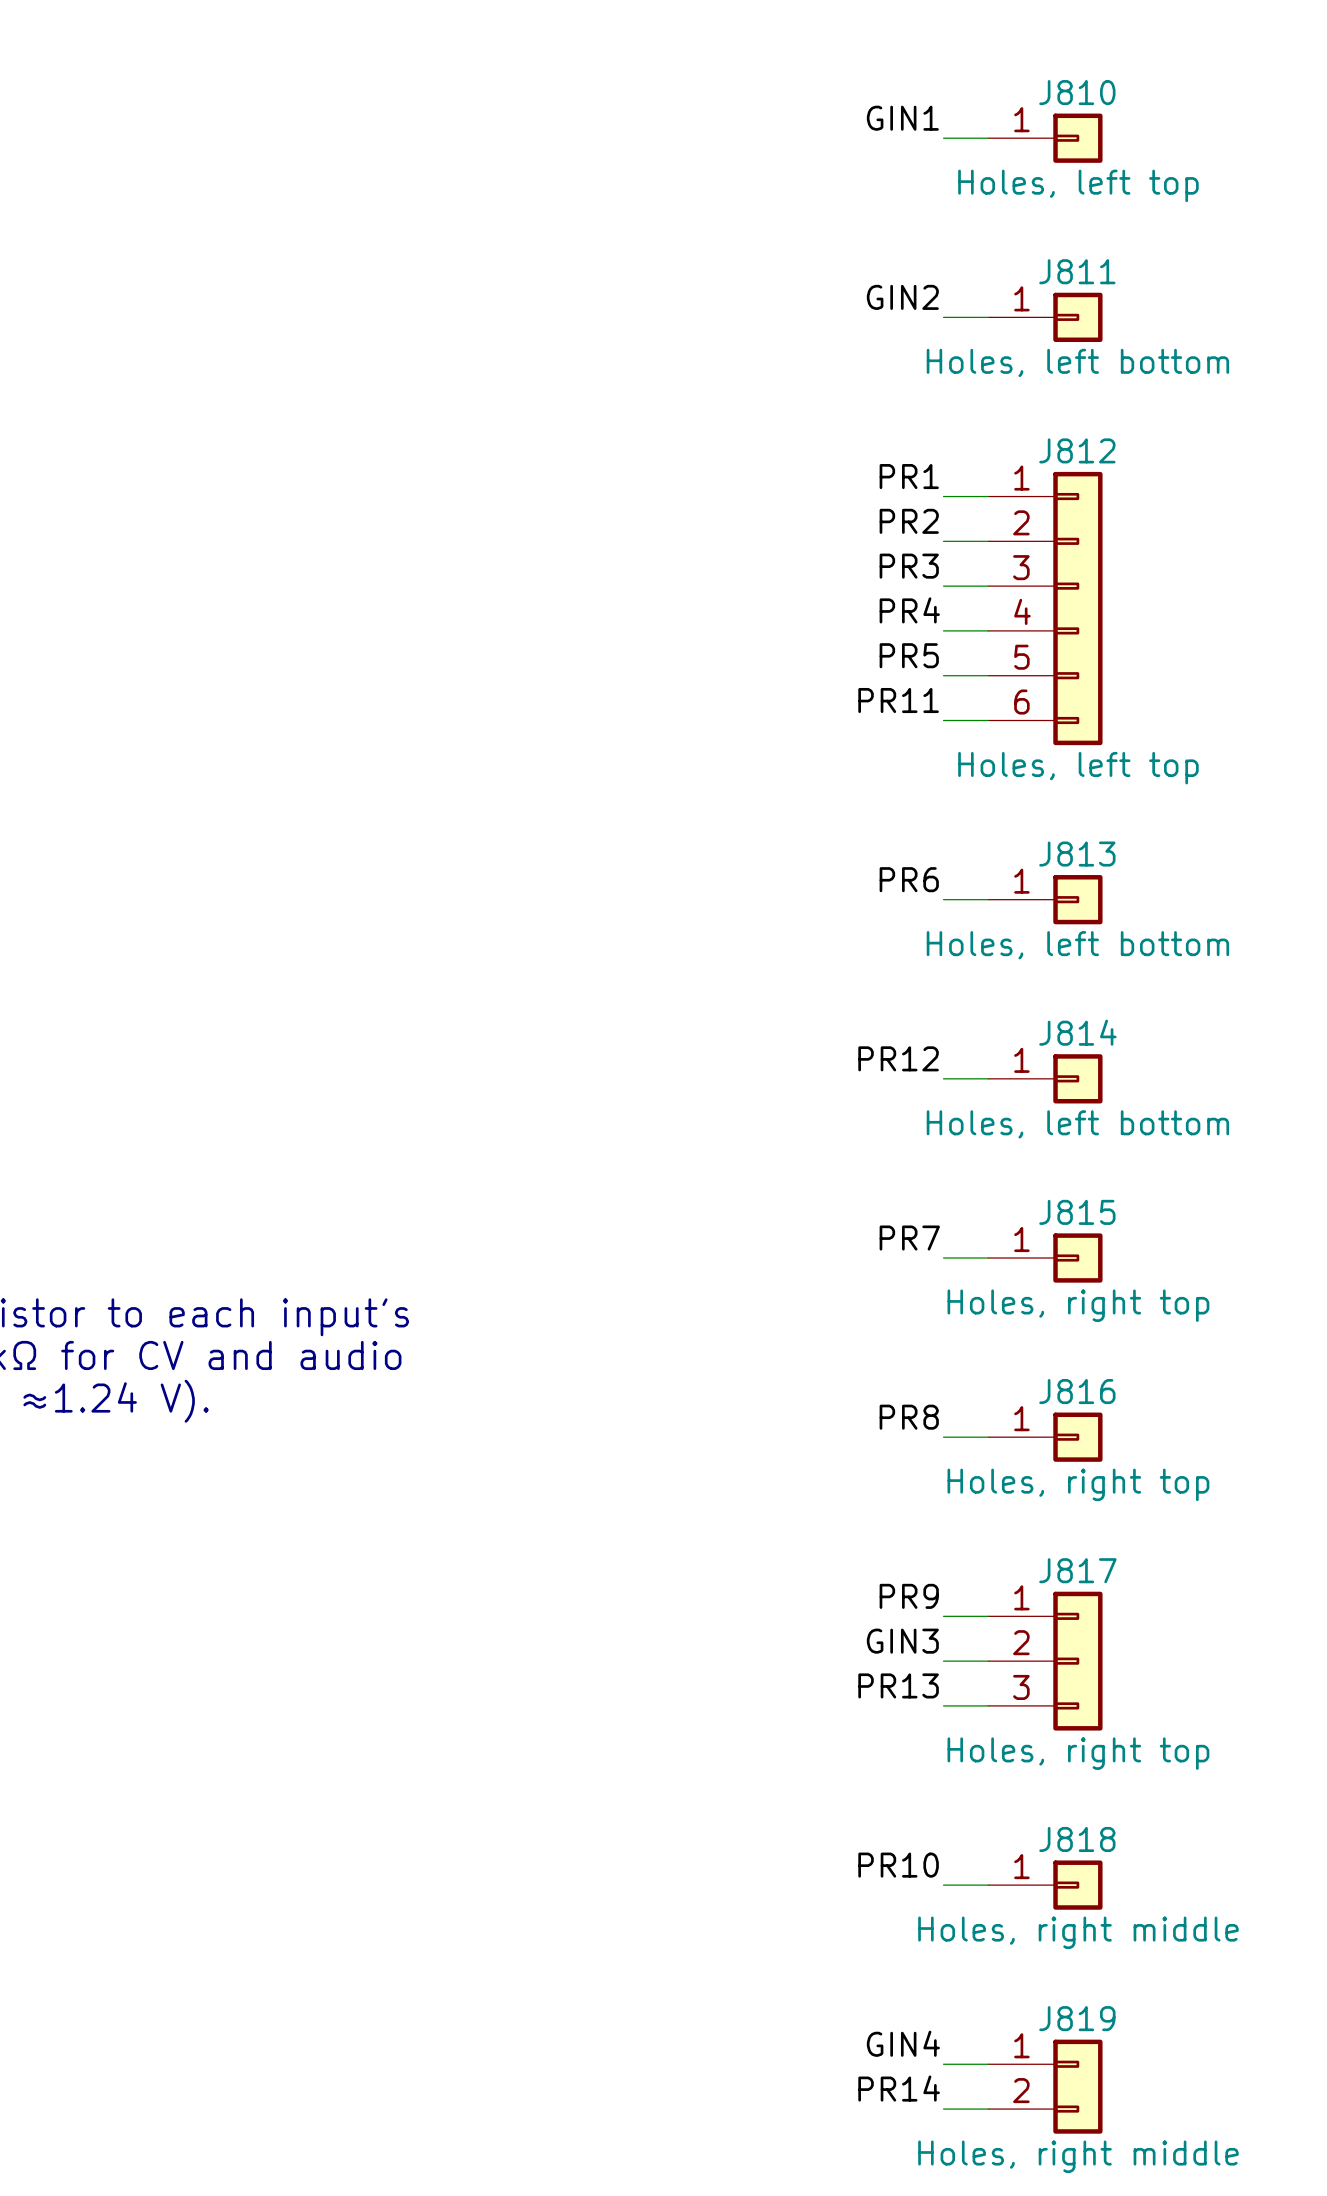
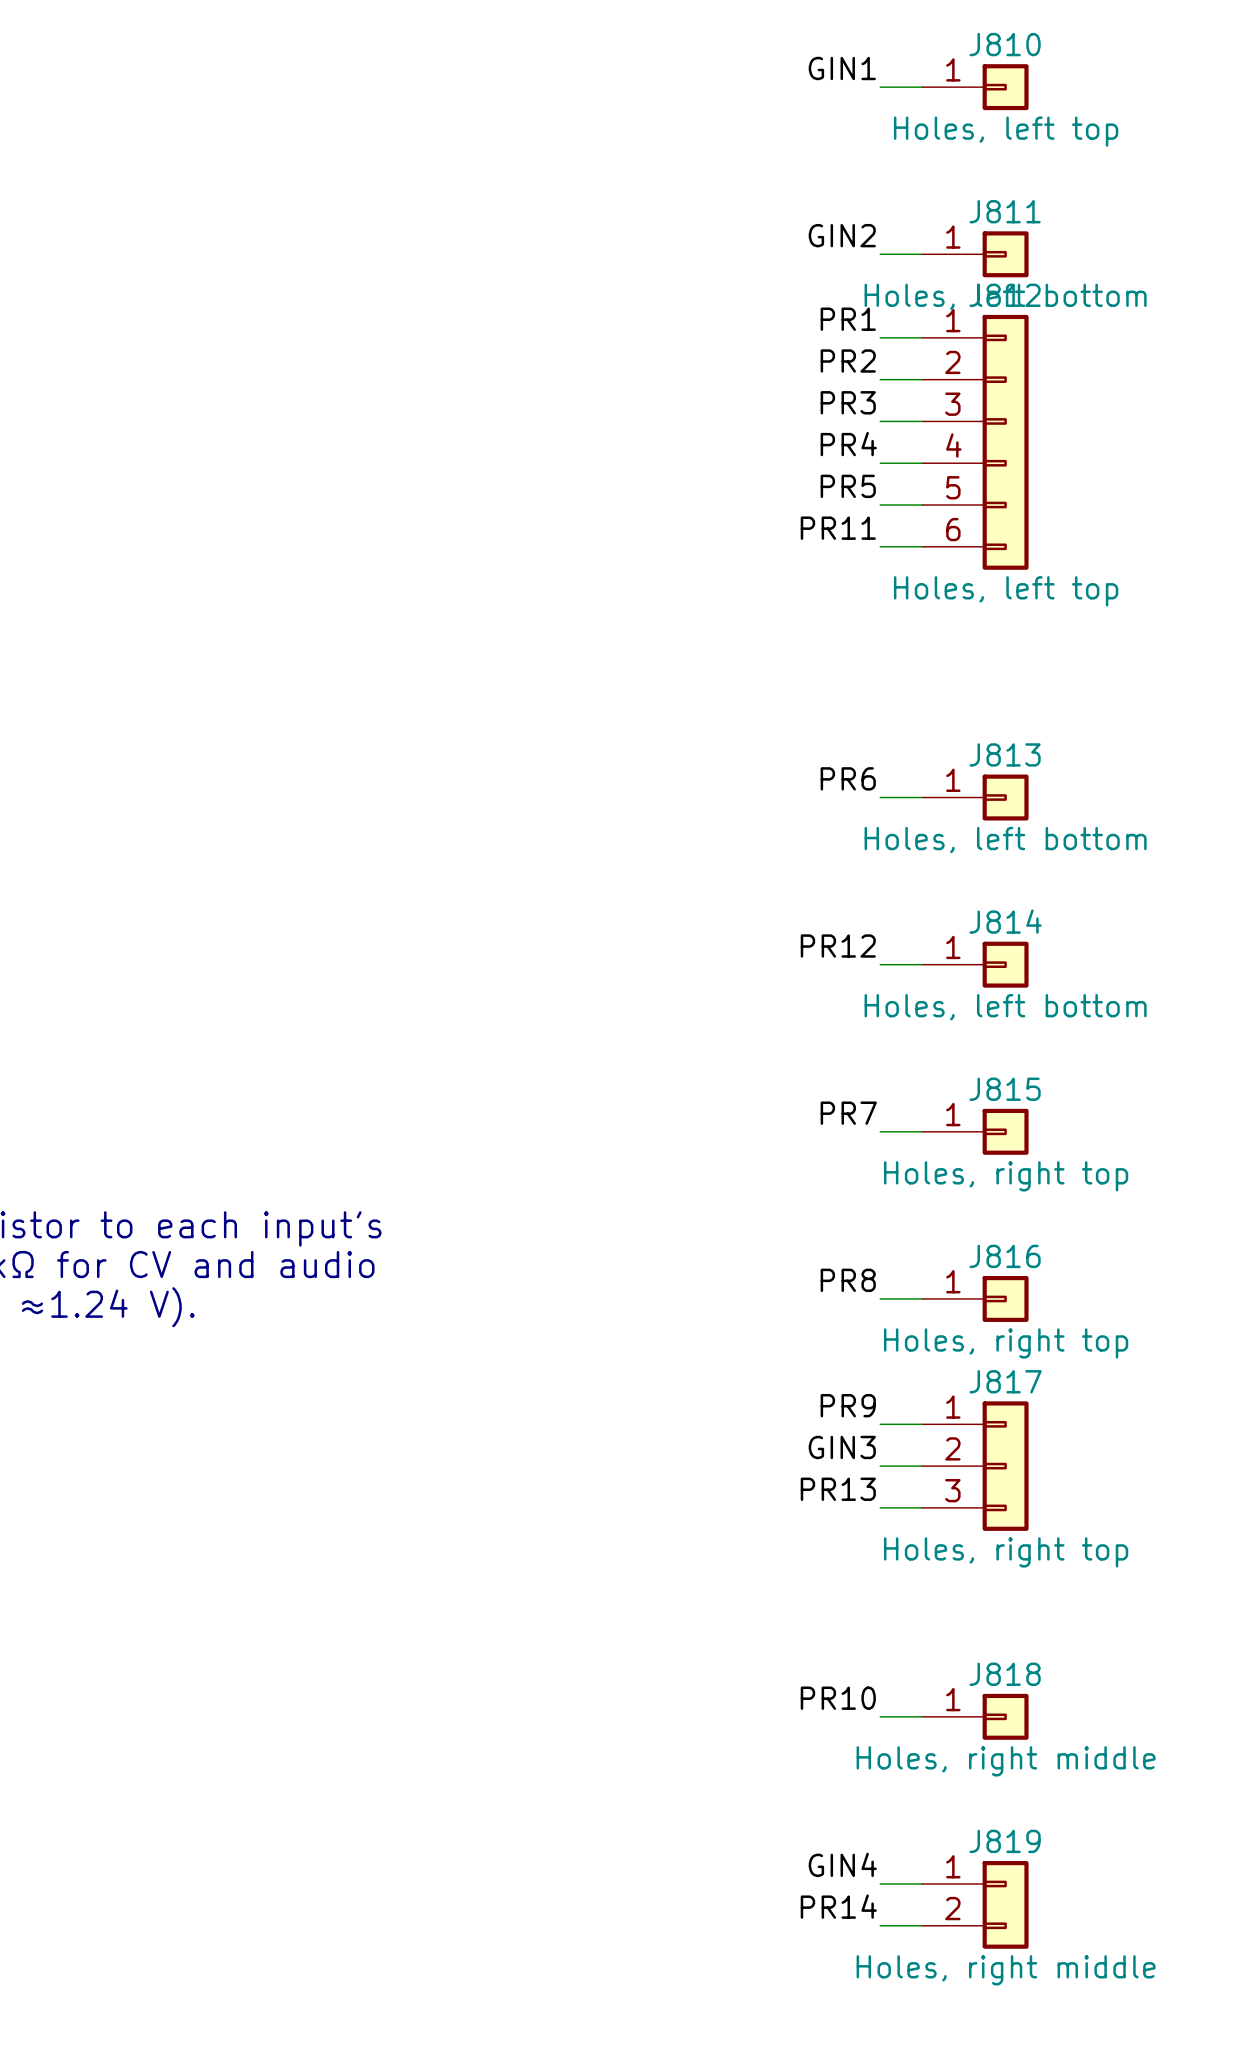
wire: none -> (880, 87) (922, 87)
label position: GIN1 (902, 118) -> GIN1 (842, 68)
wire: (943, 138) (988, 138) -> (880, 254) (922, 254)
J810 position: (1045, 138) -> (975, 87)
label position: GIN2 (902, 297) -> GIN2 (842, 235)
wire: (943, 317) (988, 317) -> (880, 421) (922, 421)
J811 position: (1045, 317) -> (975, 254)
label: none -> PR1 (848, 319)
label: none -> PR2 (848, 361)
label: none -> PR3 (848, 402)
label: PR1 (909, 476) -> PR4 (848, 444)
label: PR2 (909, 521) -> PR5 (848, 486)
label: PR3 (909, 566) -> PR11 (838, 528)
J812 position: (1045, 608) -> (975, 442)
label: PR4 (909, 610) -> none
wire: (943, 630) (988, 630) -> (880, 379) (922, 379)
label: PR5 (909, 655) -> none
wire: (943, 675) (988, 675) -> (880, 337) (922, 337)
label: PR11 (898, 700) -> none
wire: (943, 720) (988, 720) -> (880, 797) (922, 797)
label position: PR6 (909, 879) -> PR6 (848, 778)
wire: (943, 899) (988, 899) -> (880, 964) (922, 964)
J813 position: (1045, 899) -> (975, 797)
label position: PR12 (898, 1058) -> PR12 (838, 946)
wire: (943, 1078) (988, 1078) -> (880, 1131) (922, 1131)
J814 position: (1045, 1078) -> (975, 964)
label position: PR7 (909, 1238) -> PR7 (848, 1113)
wire: (943, 1258) (988, 1258) -> (880, 1298) (922, 1298)
J815 position: (1045, 1258) -> (975, 1131)
label position: PR8 (909, 1417) -> PR8 (848, 1280)
wire: (943, 1437) (988, 1437) -> (880, 1466) (922, 1466)
J816 position: (1045, 1437) -> (975, 1298)
label: none -> PR9 (848, 1405)
label: PR9 (909, 1596) -> PR13 (838, 1489)
label position: GIN3 (902, 1641) -> GIN3 (842, 1447)
wire: (943, 1661) (988, 1661) -> (880, 1424) (922, 1424)
J817 position: (1045, 1661) -> (975, 1466)
label: PR13 (898, 1685) -> none
wire: (943, 1705) (988, 1705) -> (880, 1716) (922, 1716)
label position: PR10 (898, 1865) -> PR10 (838, 1698)
wire: (943, 1885) (988, 1885) -> (880, 1883) (922, 1883)
J818 position: (1045, 1885) -> (975, 1716)
label: none -> GIN4 (842, 1864)
label: GIN4 (903, 2043) -> PR14 (838, 1906)
J819 position: (1045, 2086) -> (975, 1904)
label: PR14 (899, 2088) -> none
wire: (943, 2109) (988, 2109) -> none

